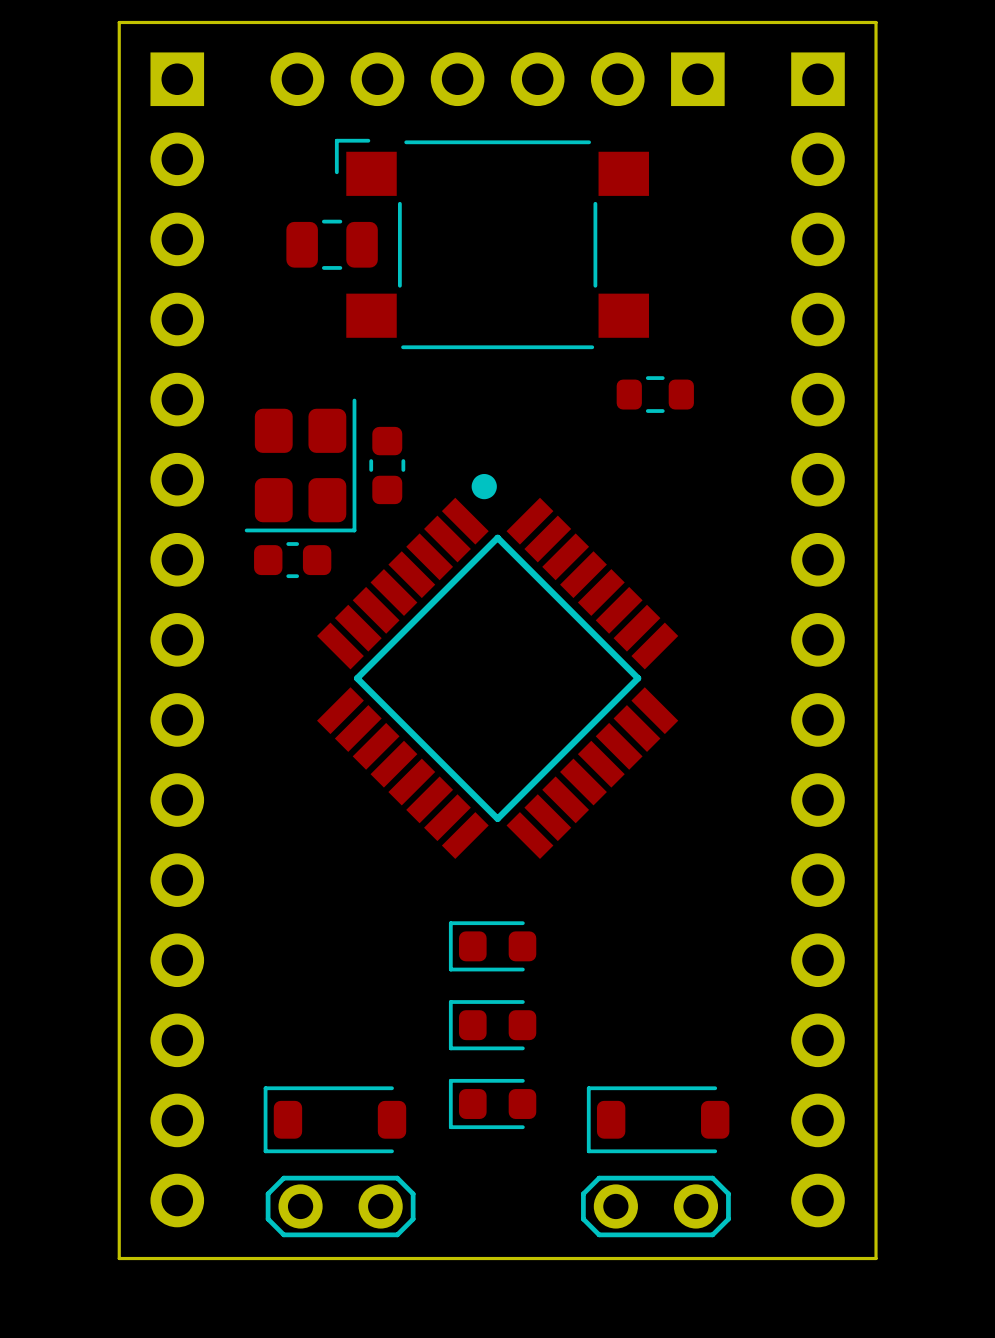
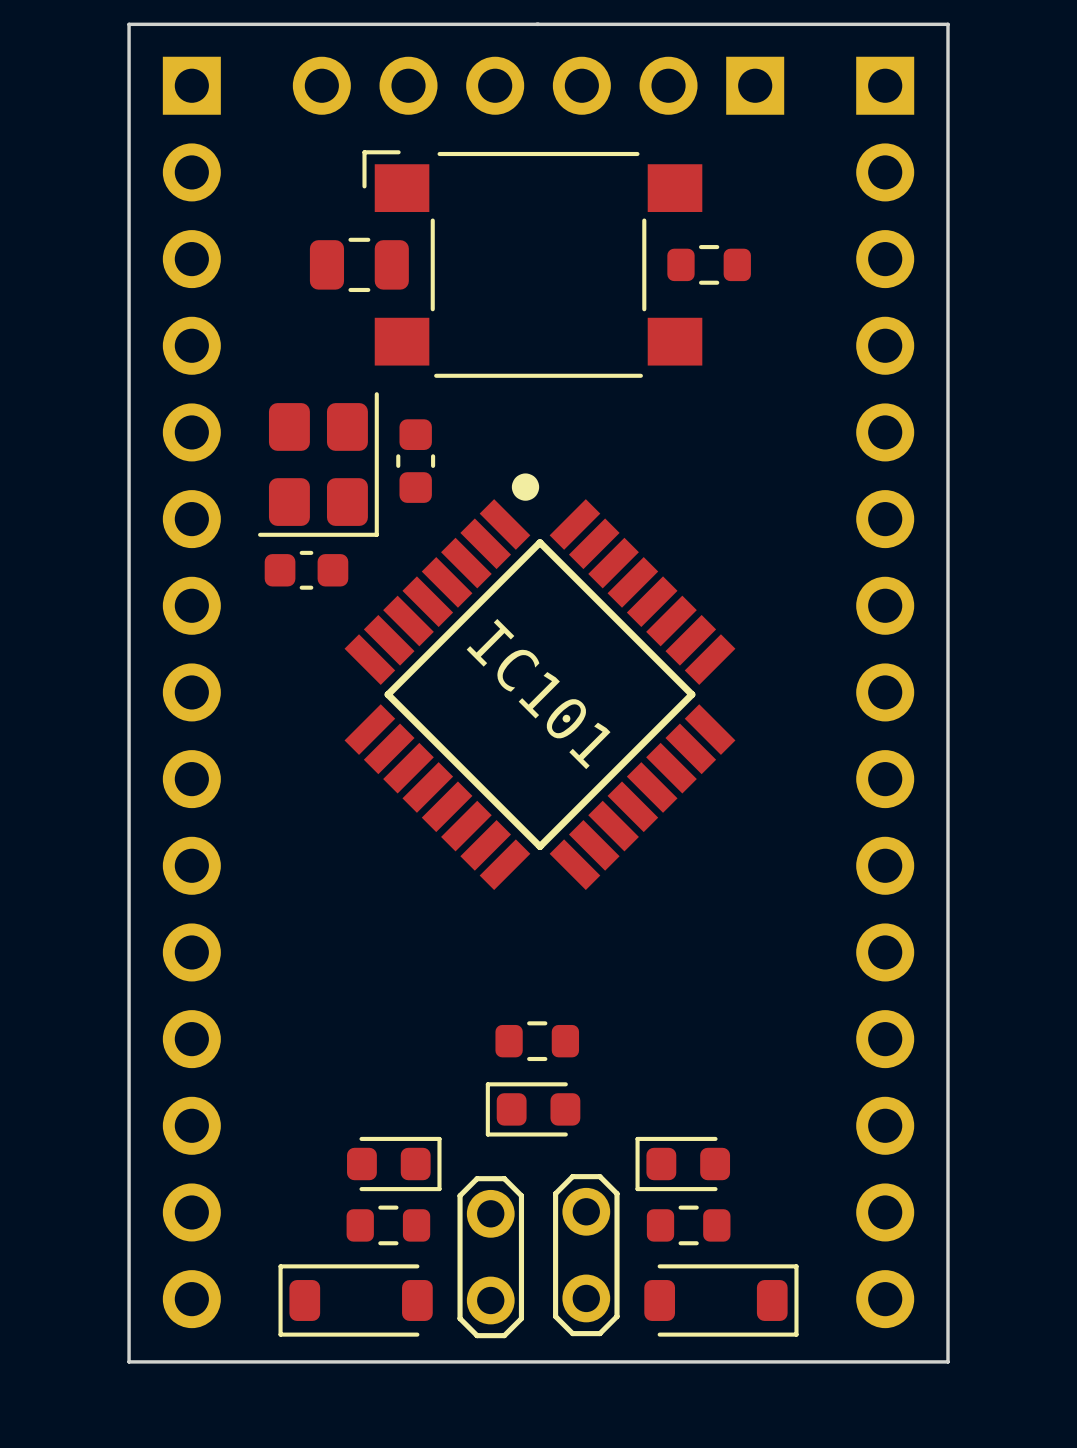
part position: (655, 394) -> (709, 264)
part position: (300, 465) -> (318, 464)
part position: (387, 465) -> (415, 461)
part position: (292, 560) -> (306, 570)
IC101: none -> (539, 681)
part: (497, 666) -> none
part footprint: [448, 921, 537, 972] -> [495, 1021, 580, 1062]
part: none -> (394, 1164)
part: none -> (682, 1164)
part footprint: [586, 1086, 730, 1154] -> [646, 1205, 731, 1246]
part: (492, 1104) -> none
part: (334, 1119) -> none
part: none -> (388, 1225)
part: none -> (586, 1255)
part: none -> (490, 1257)
part footprint: [265, 1175, 416, 1238] -> [278, 1264, 433, 1337]
part footprint: [581, 1175, 731, 1238] -> [644, 1264, 799, 1337]

